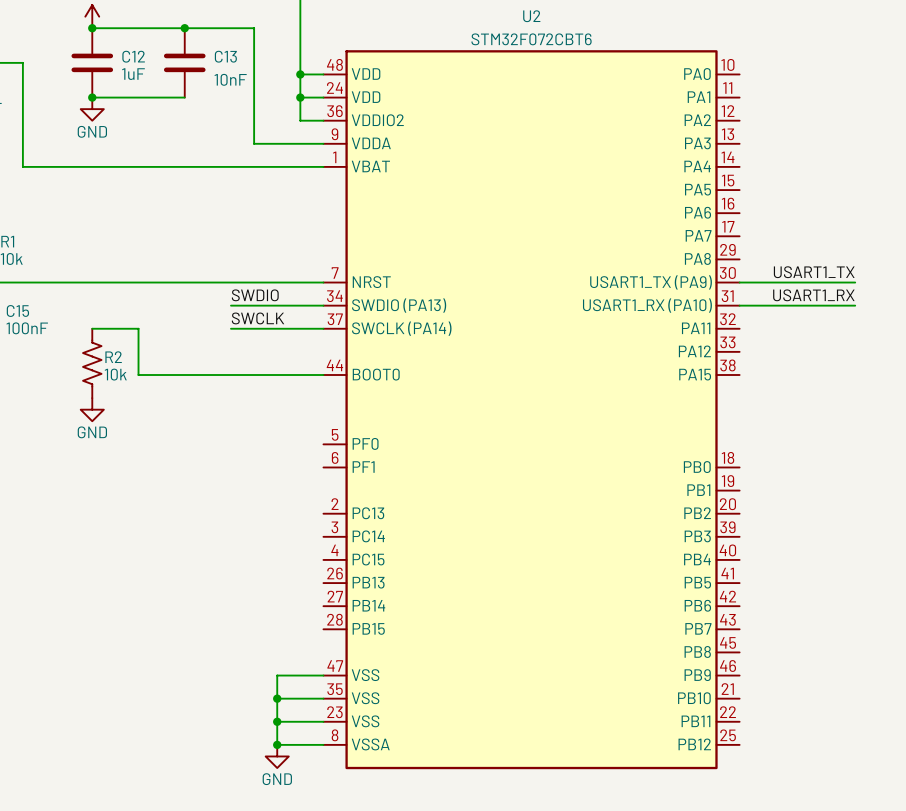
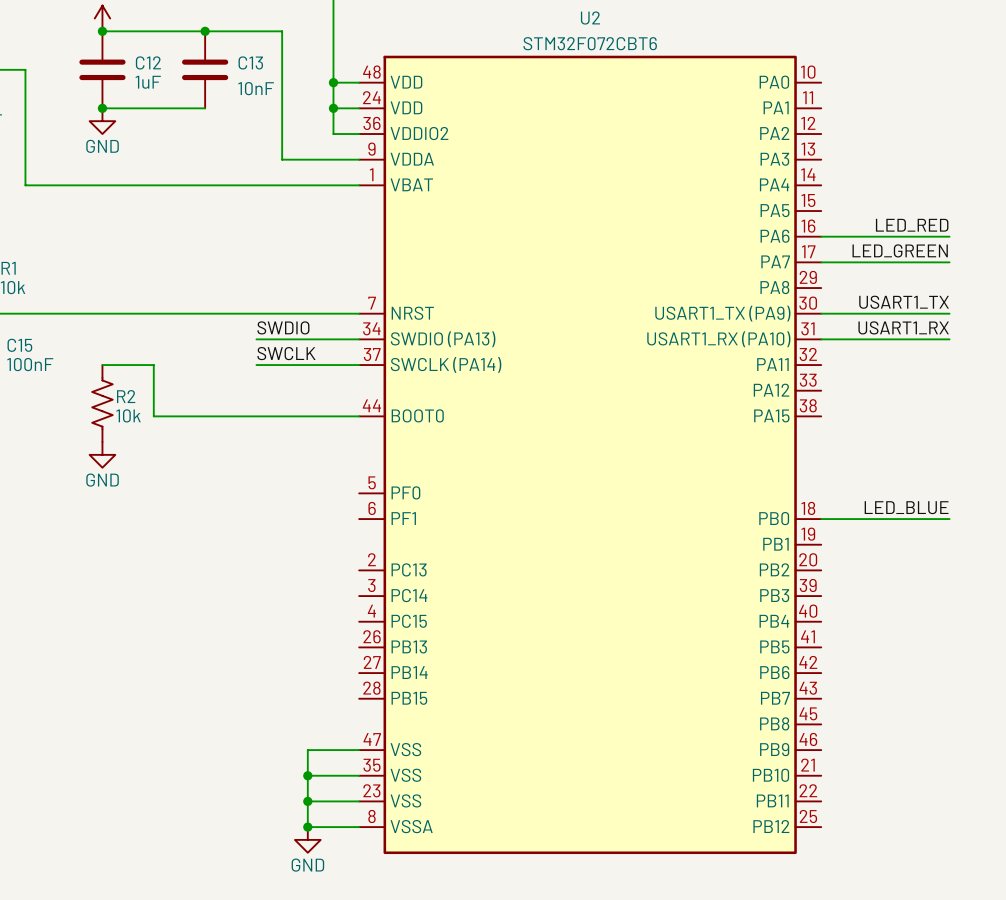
label: none -> LED_RED (912, 225)
wire: none -> (821, 236) (949, 236)
label: none -> LED_GREEN (900, 250)
wire: none -> (821, 262) (949, 262)
label: none -> LED_BLUE (906, 507)
wire: none -> (821, 519) (949, 519)

